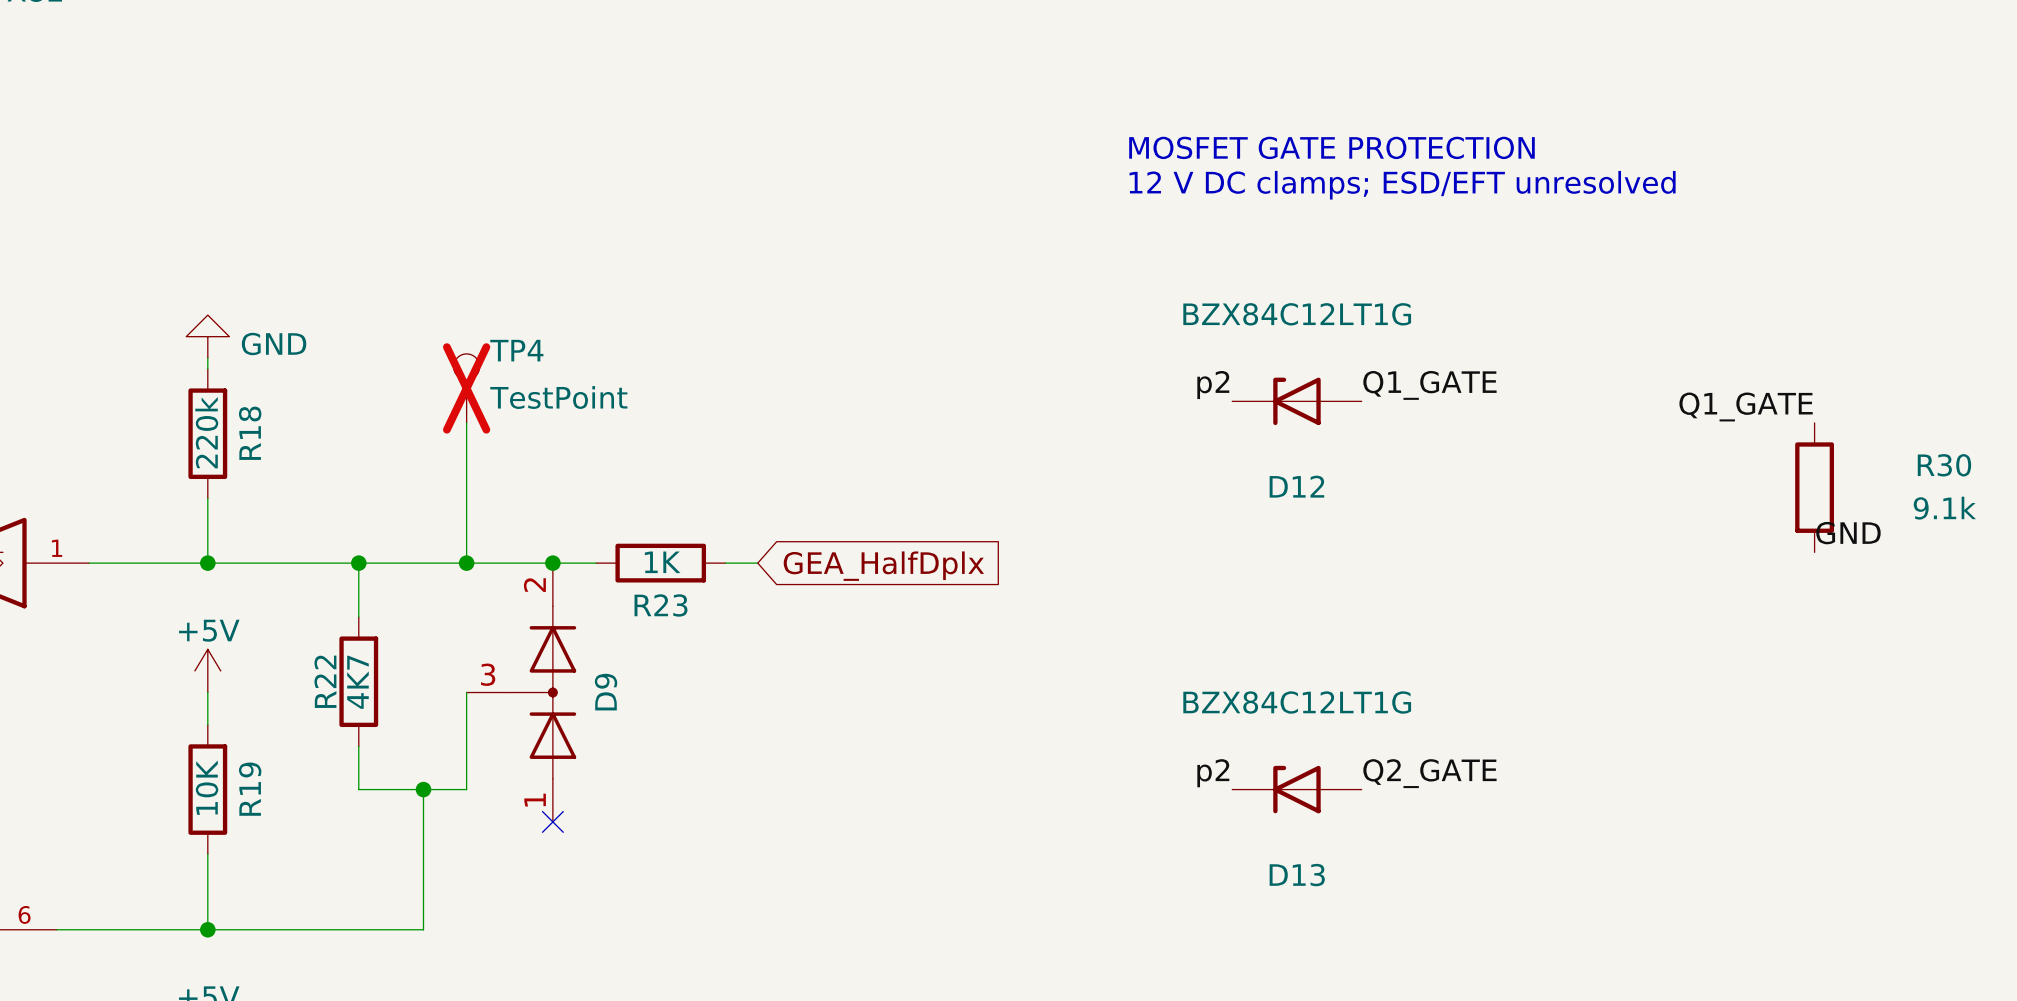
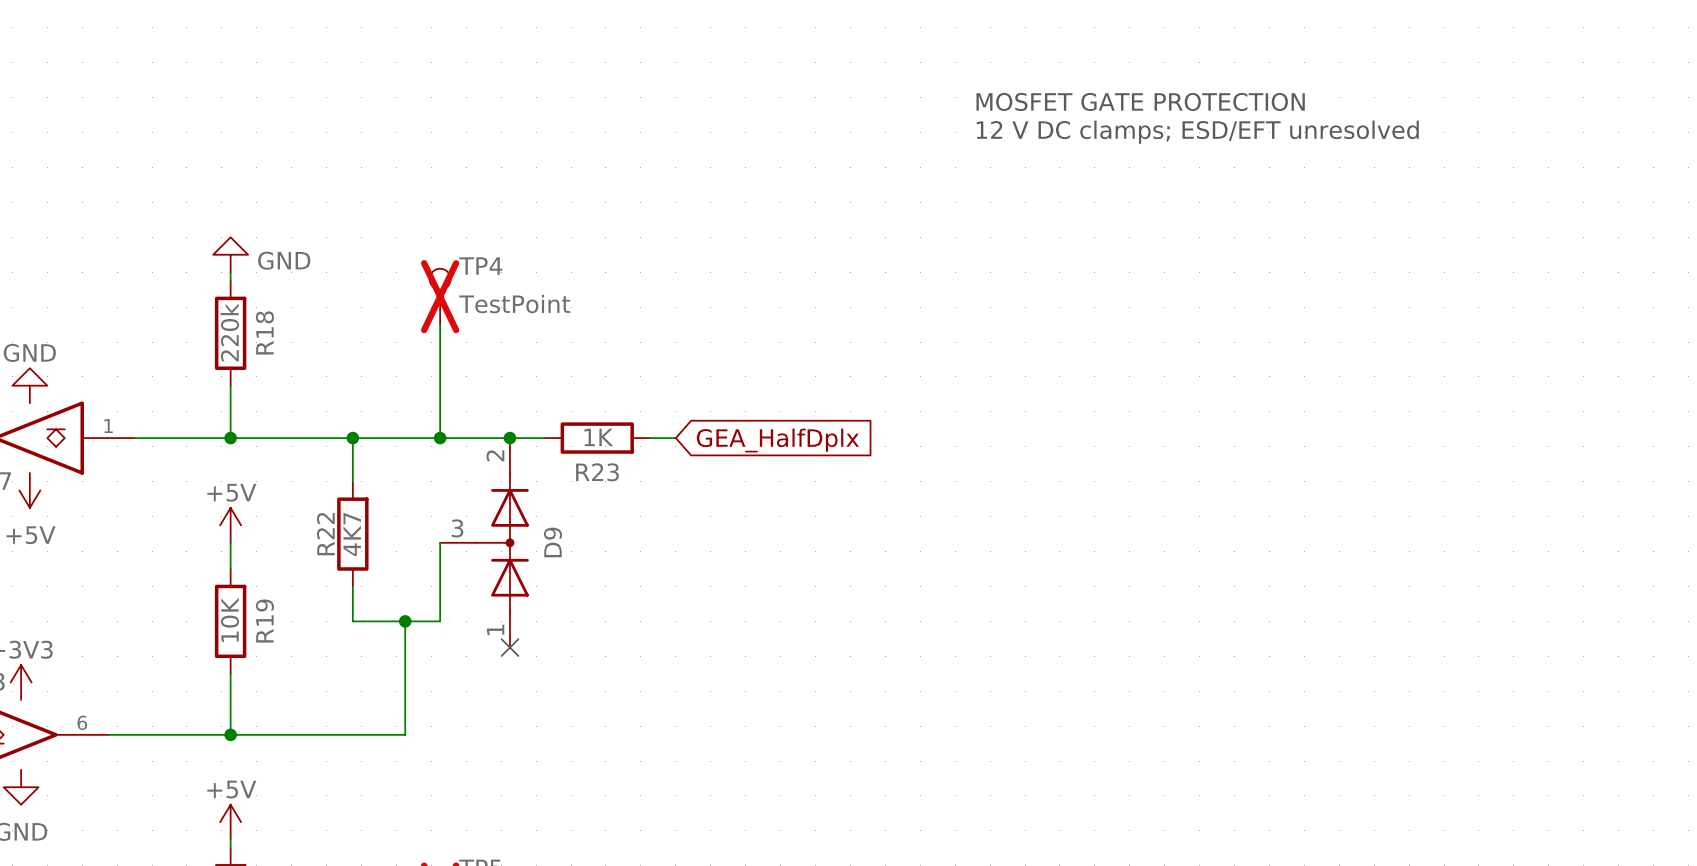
label: p2 (1213, 385) -> none
label: Q1_GATE (1429, 385) -> none
D12: BZX84C12LT1G (1296, 401) -> none
label: Q1_GATE (1746, 406) -> none
R30: 9.1k (1814, 487) -> none
label: GND (1848, 533) -> none
label: p2 (1213, 773) -> none
label: Q2_GATE (1429, 773) -> none
D13: BZX84C12LT1G (1296, 789) -> none

